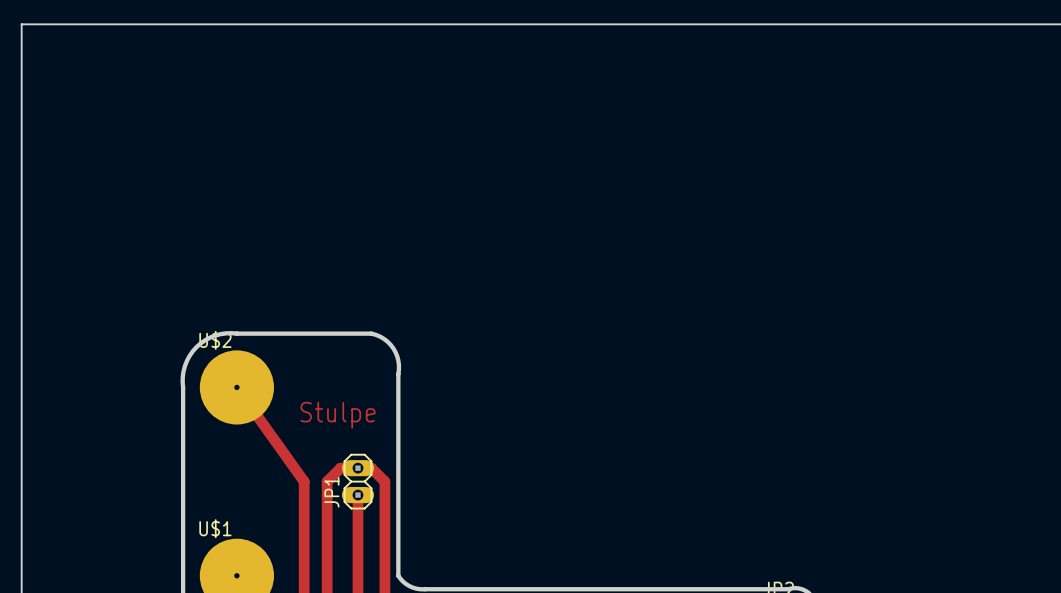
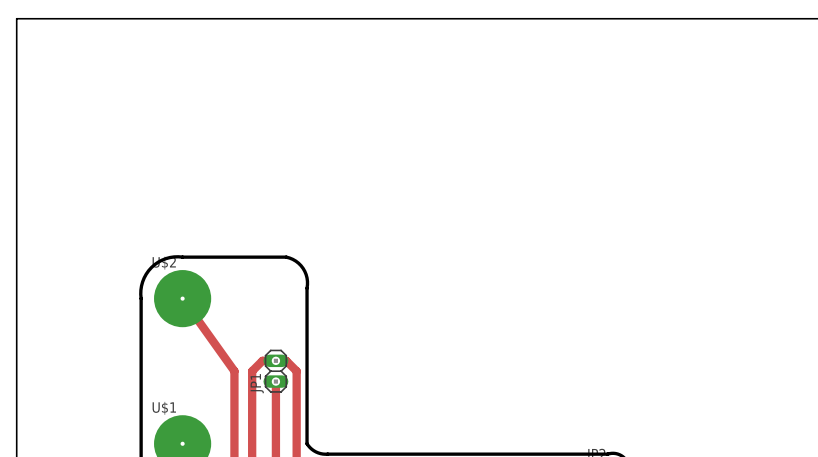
text: Stulpe (338, 415) -> none

